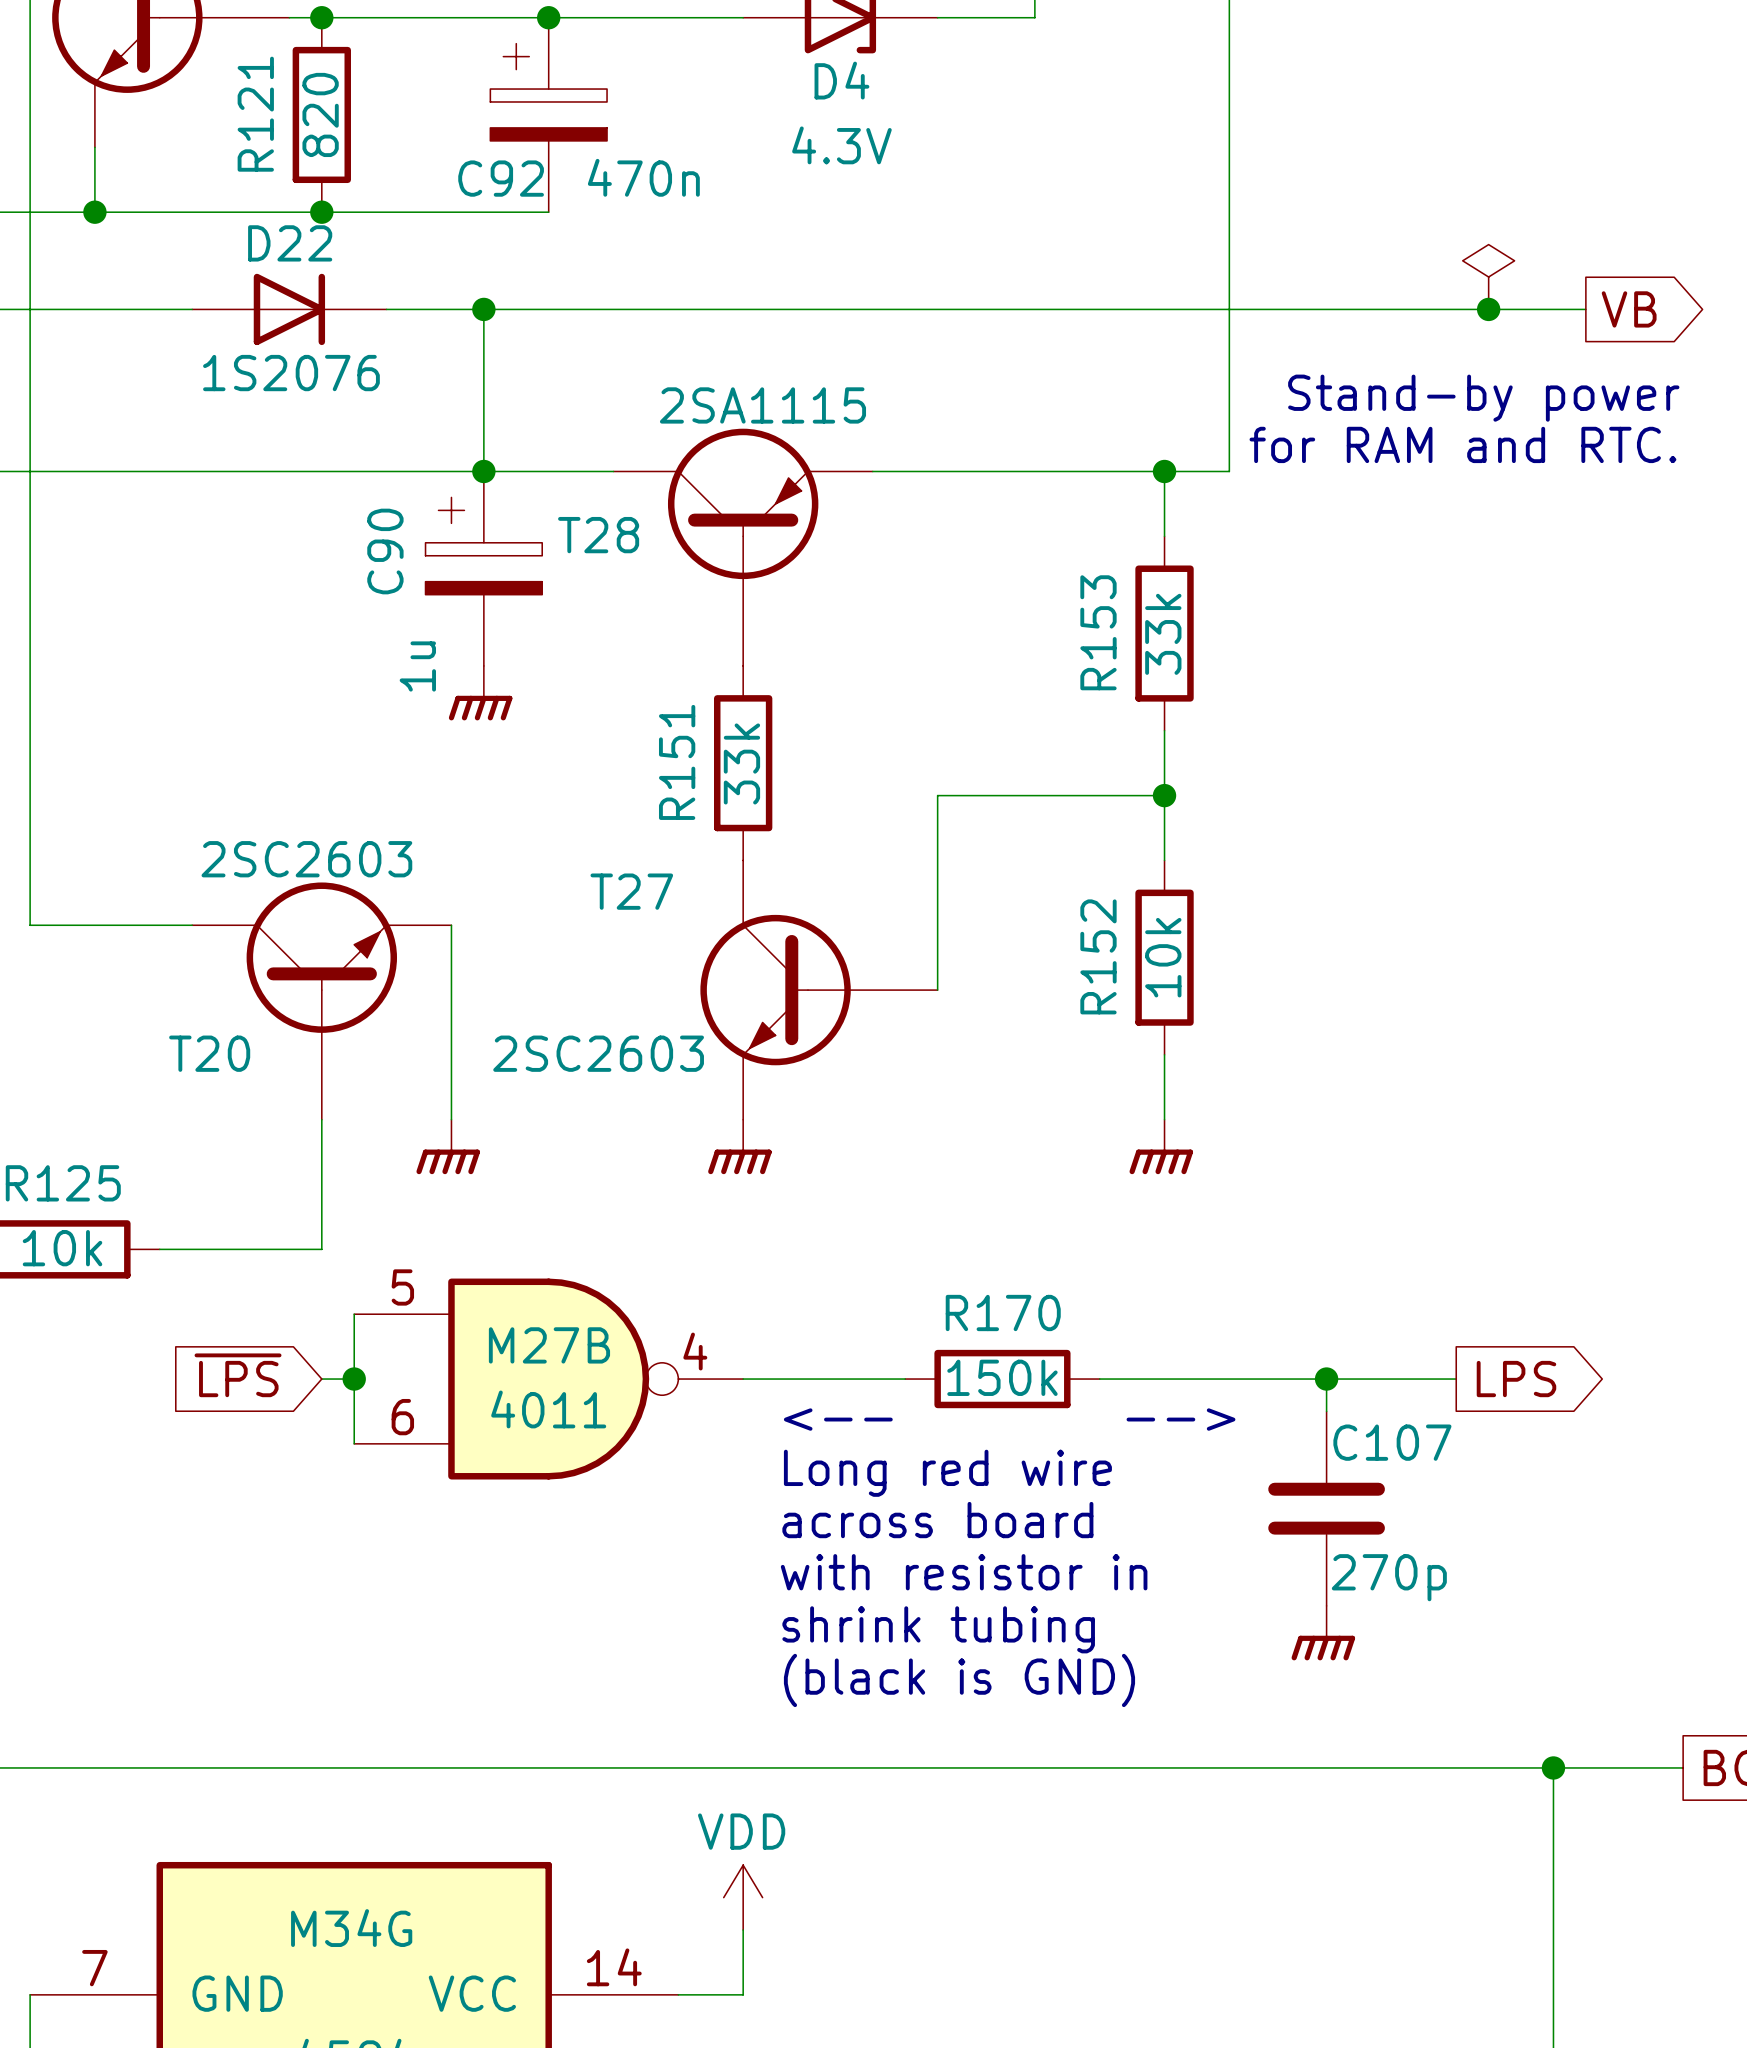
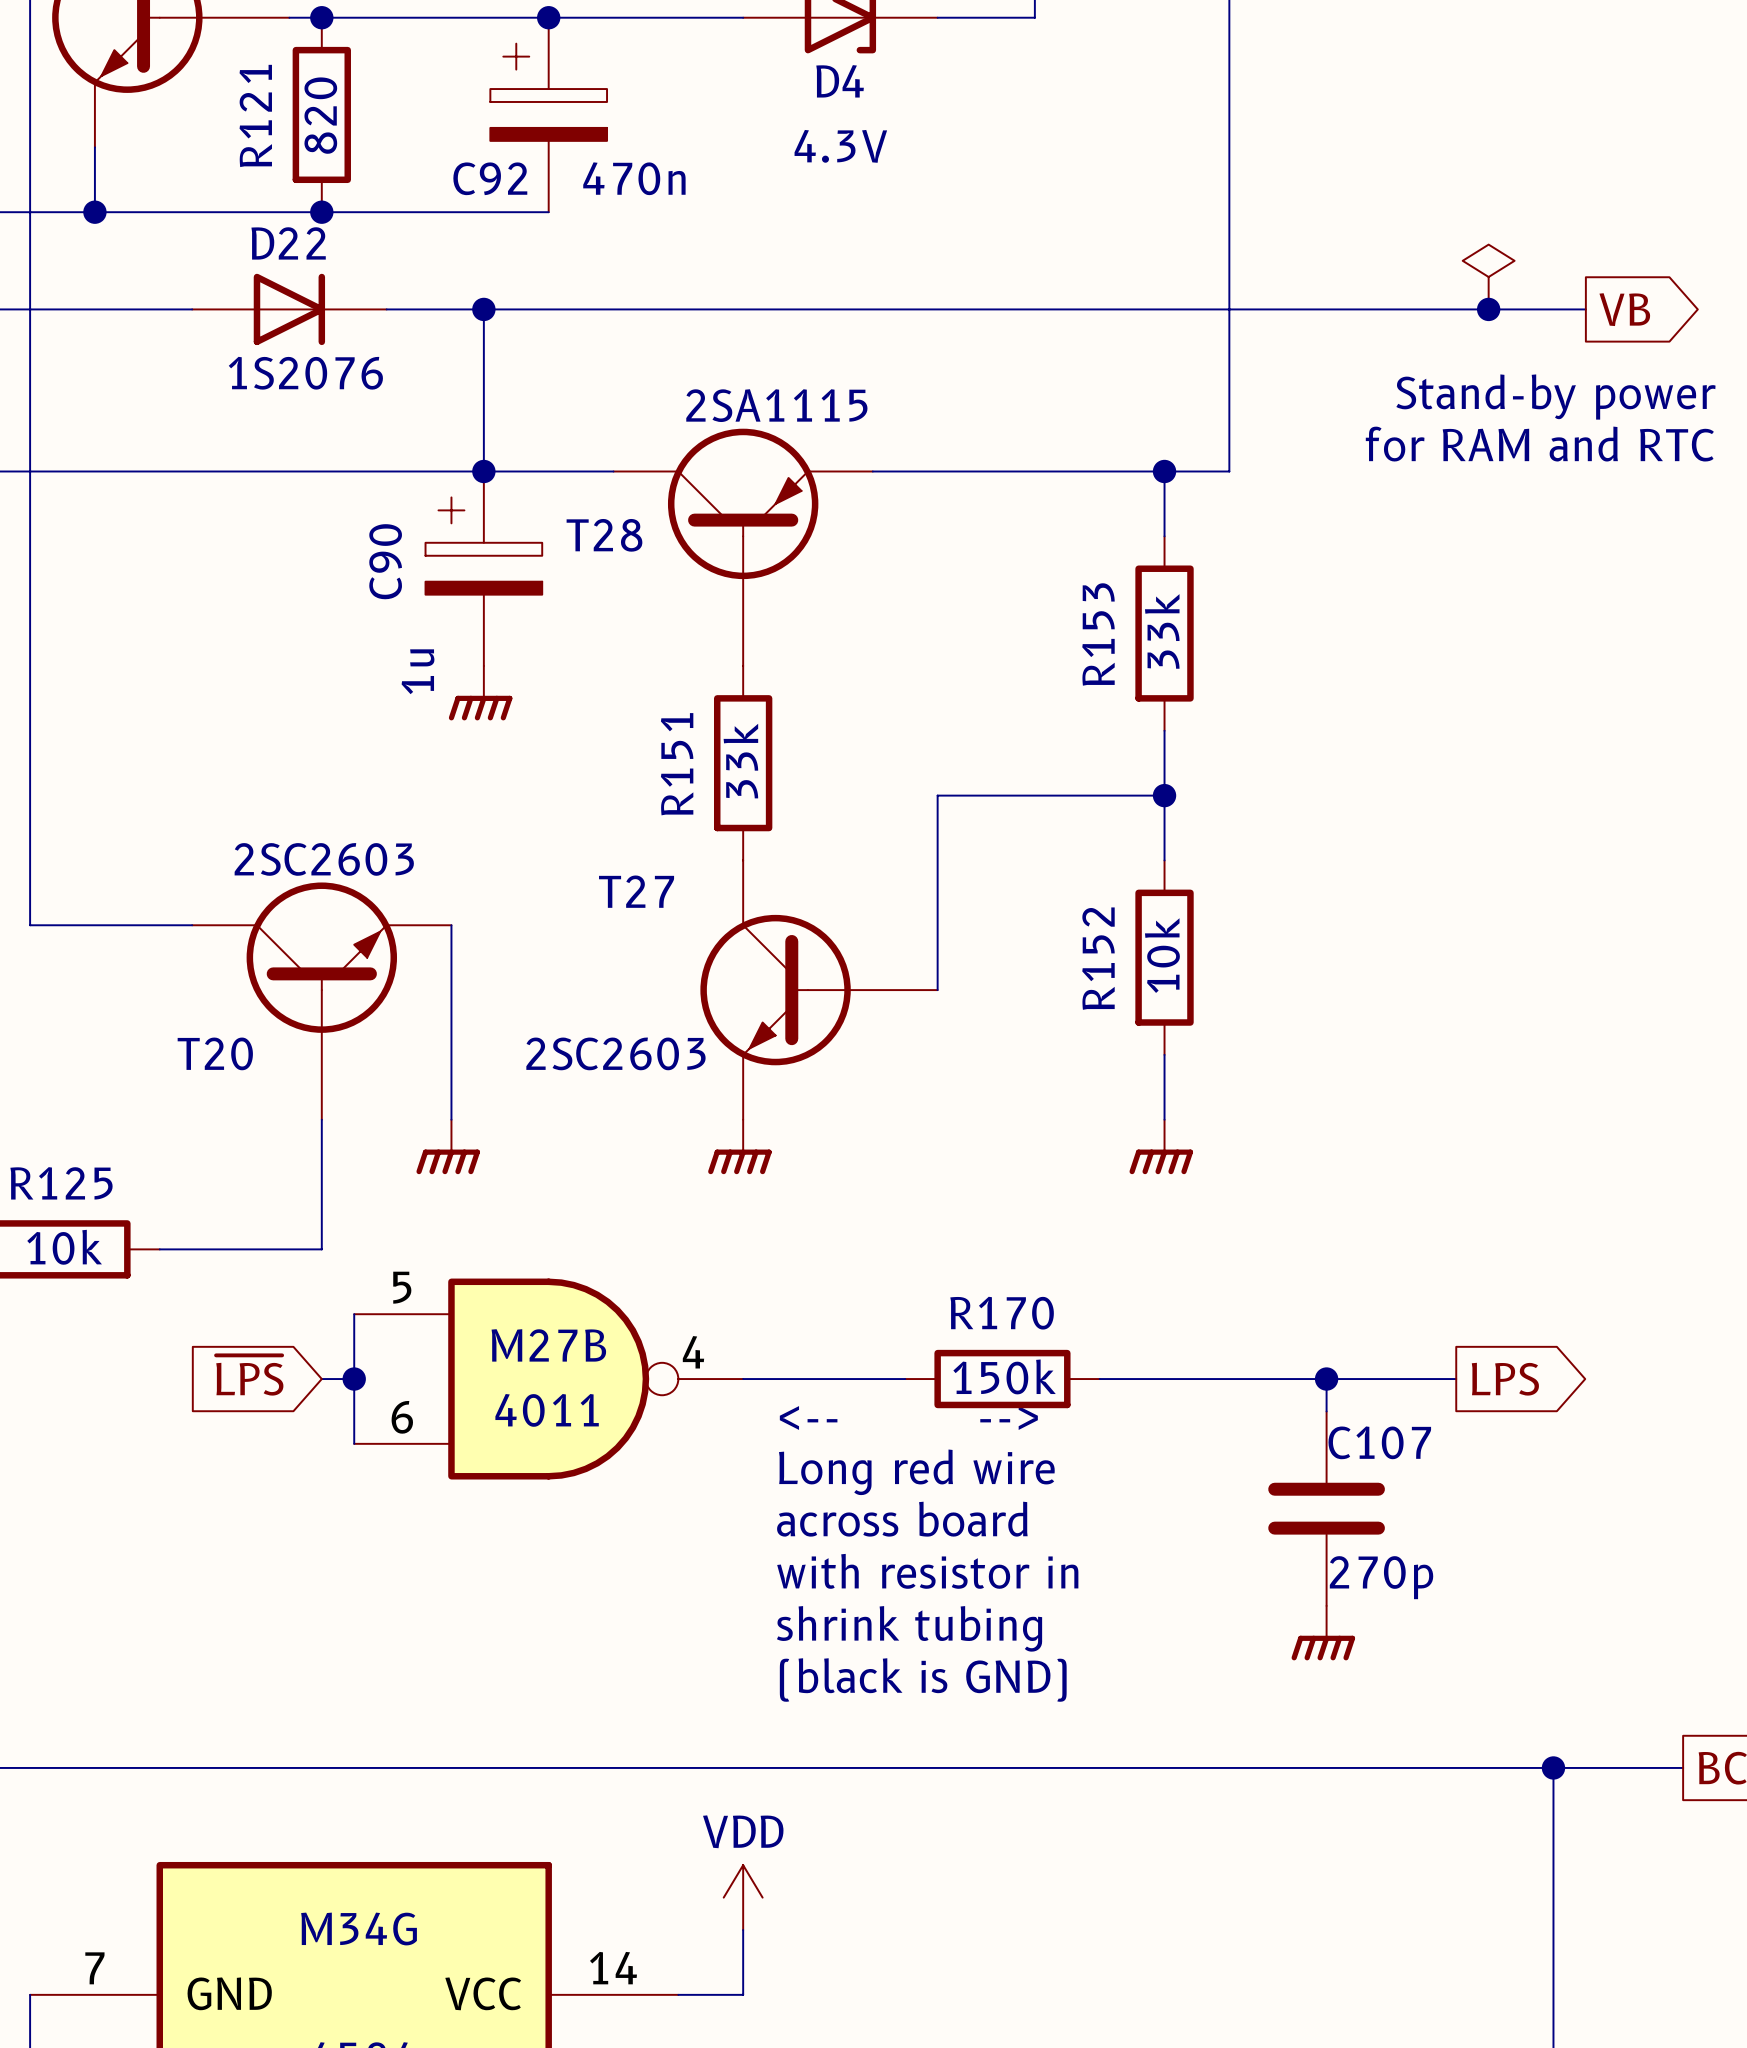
text position: Stand-by power (1483, 398) -> Stand-by power (1555, 397)
text: for RAM and RTC. (1462, 444) -> for RAM and RTC (1539, 444)

